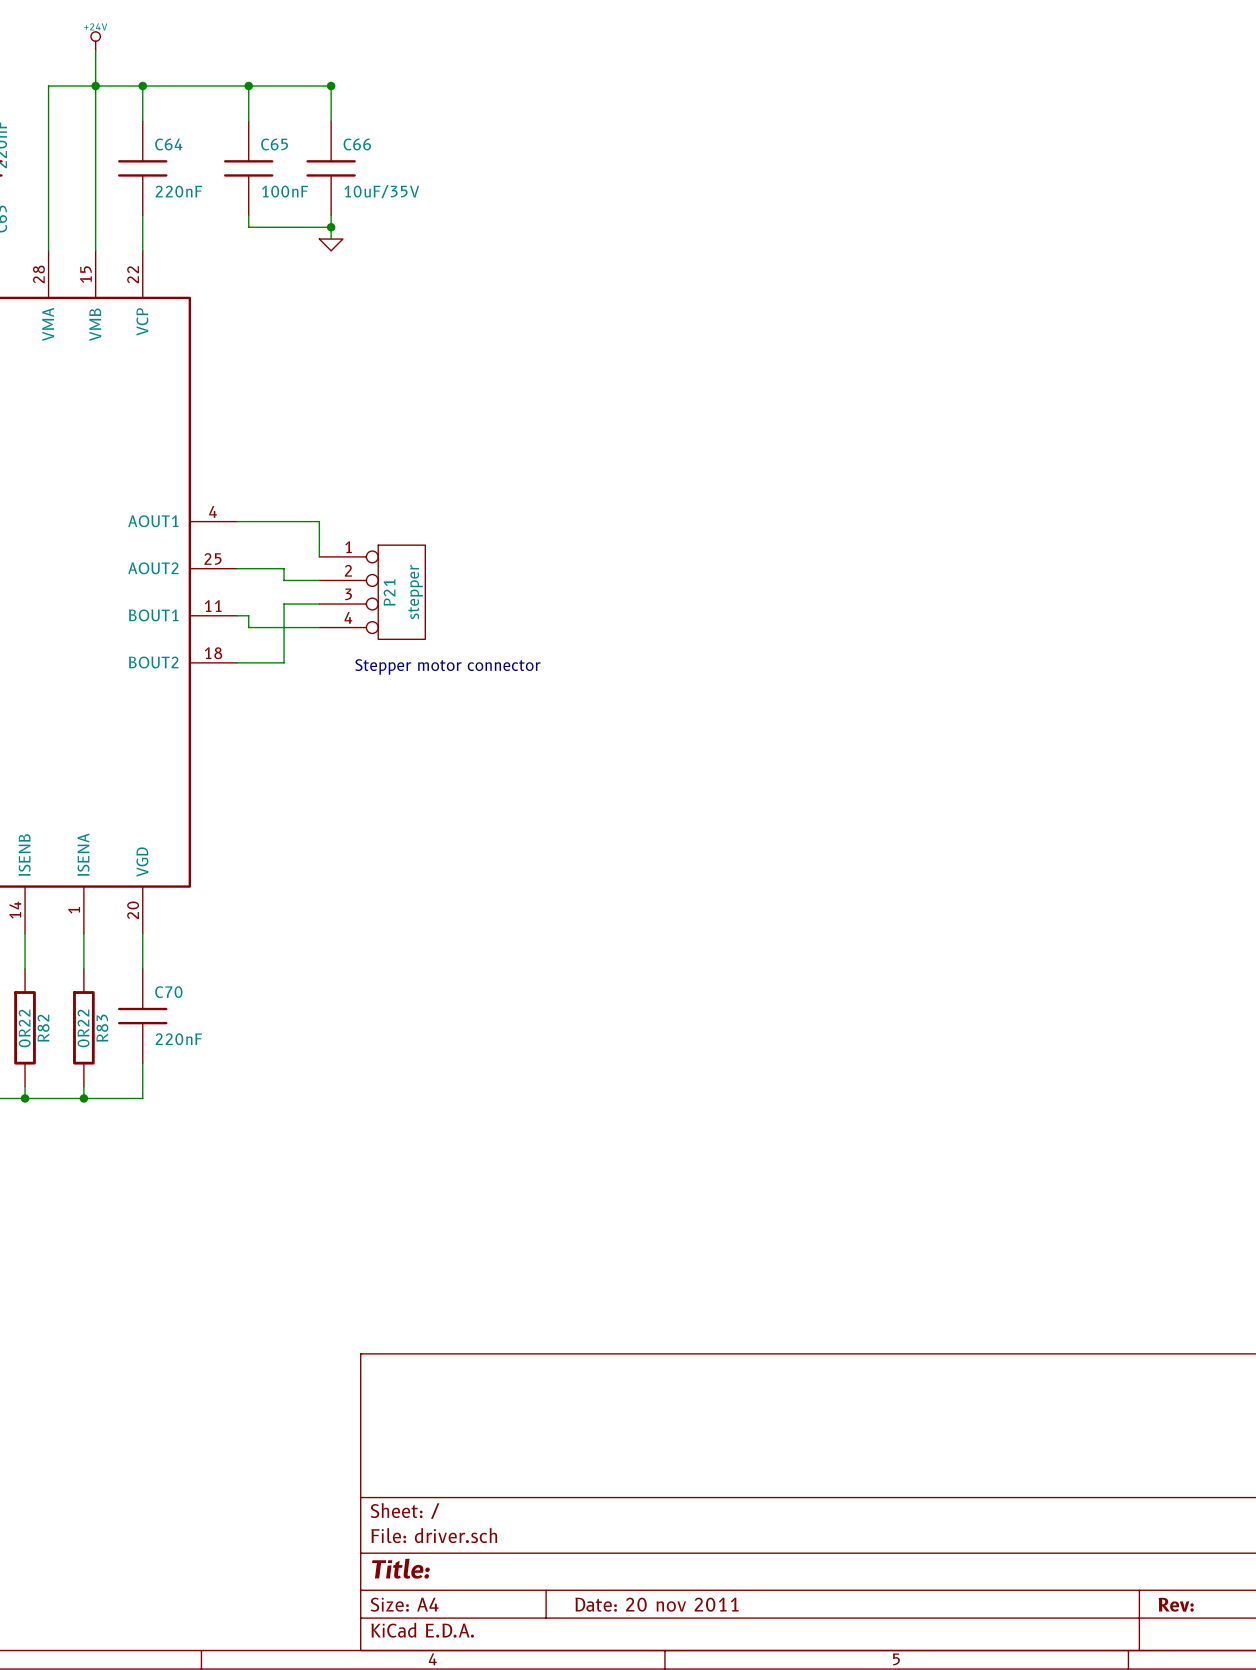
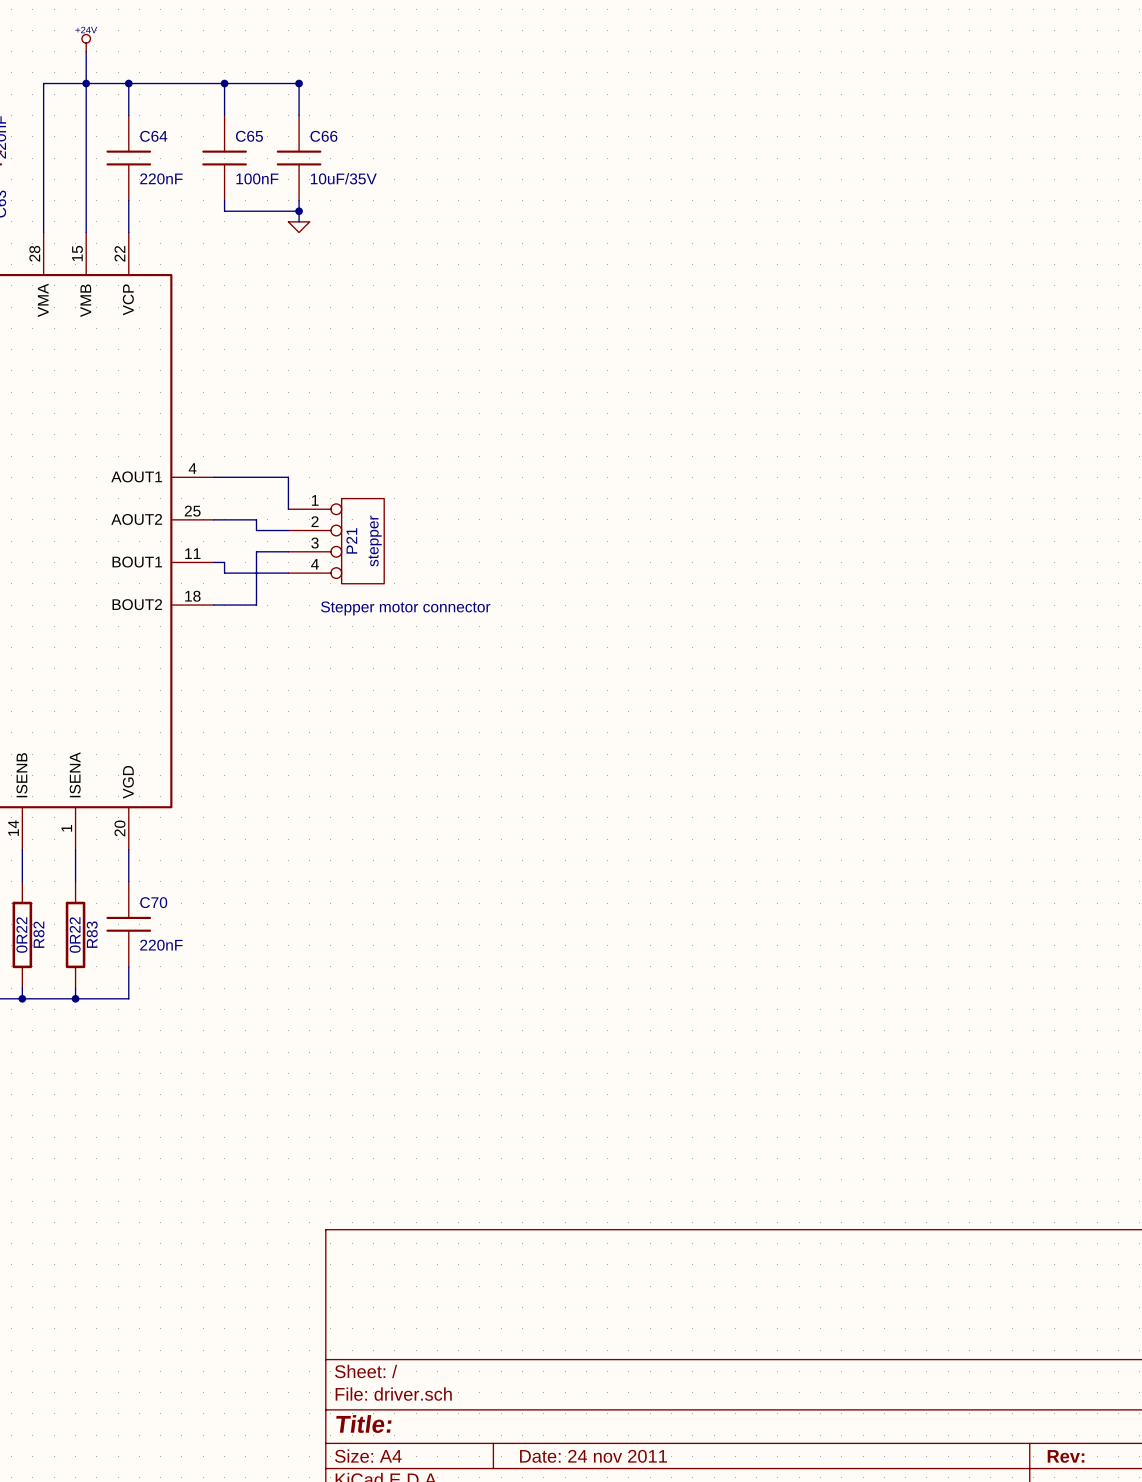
title block: Date: 20 nov 2011 (657, 1604) -> Date: 24 nov 2011 (593, 1456)

